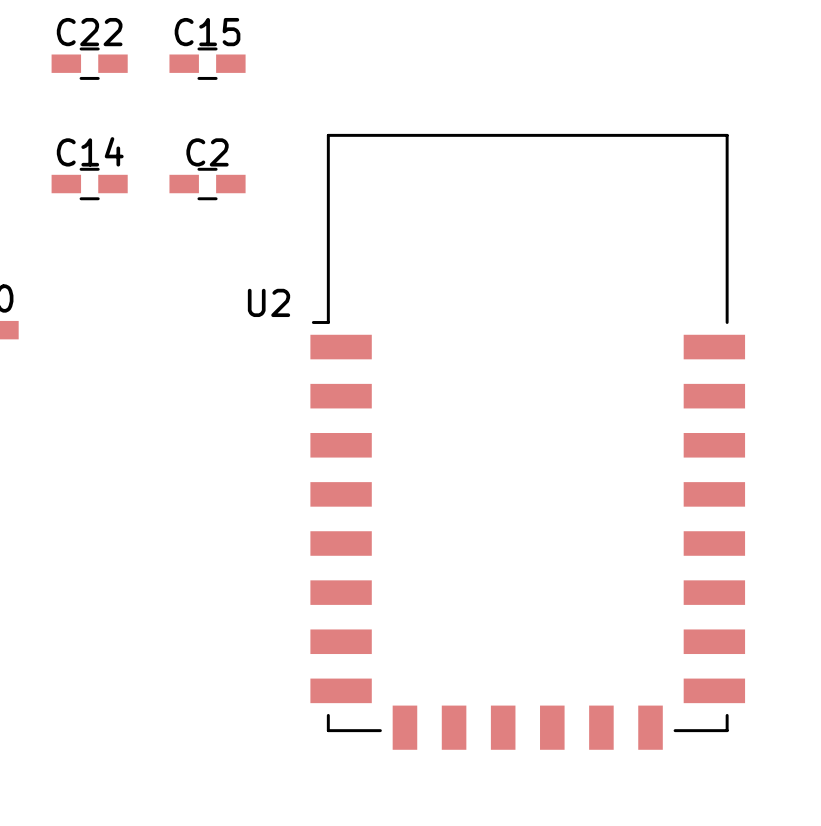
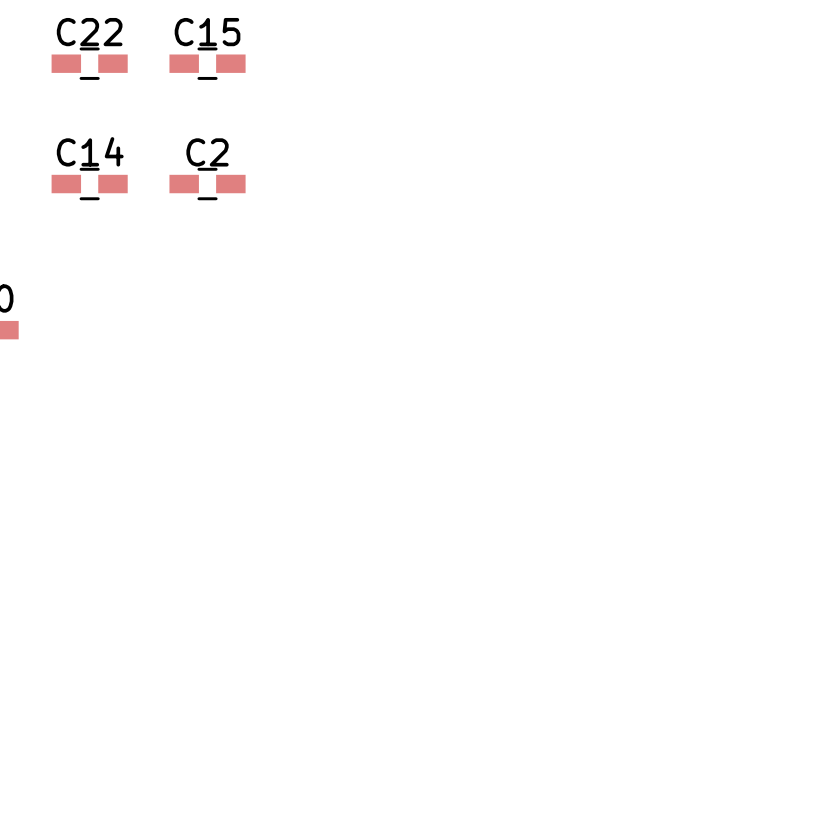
U2: (527, 441) -> none

